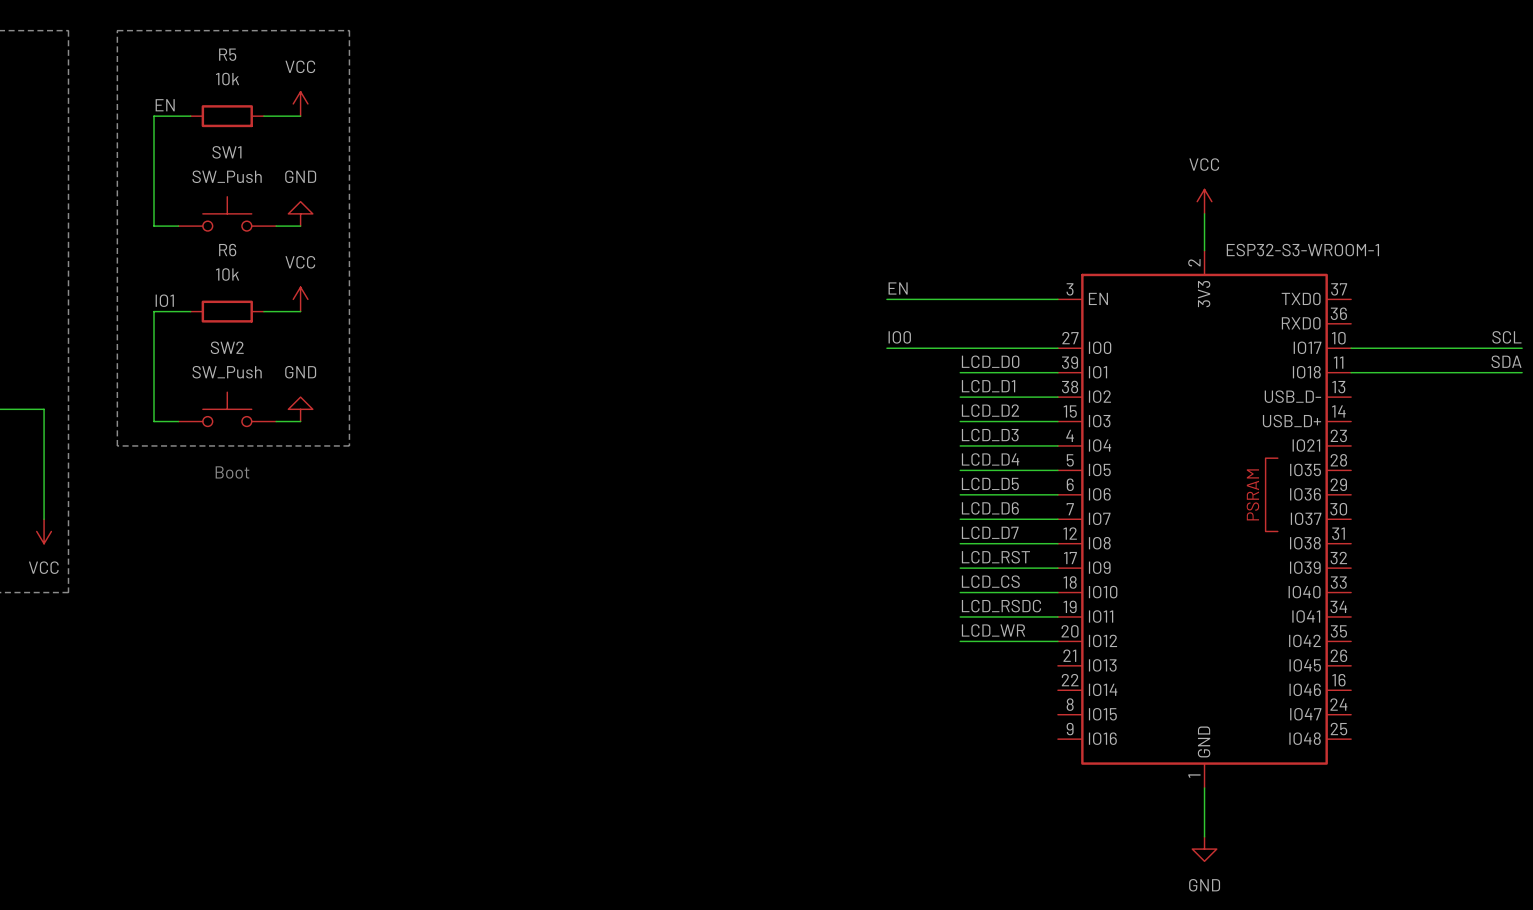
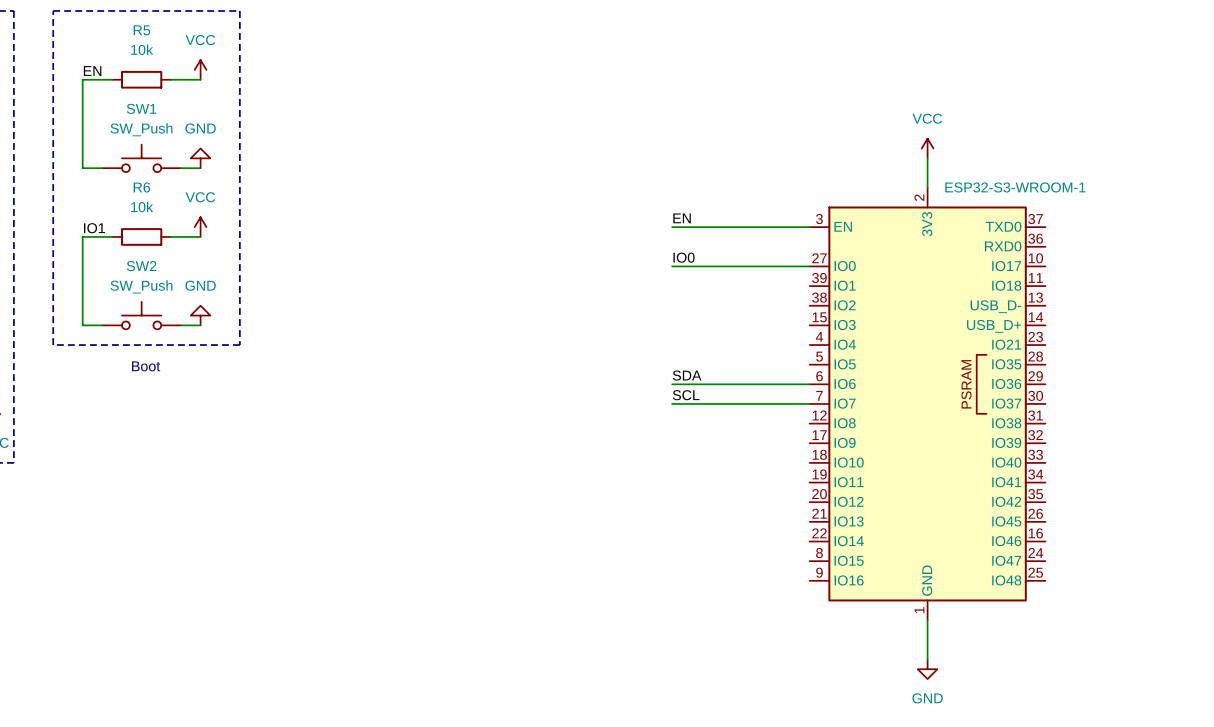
label: SCL (1506, 337) -> none
wire: (1351, 348) (1522, 348) -> none
label: LCD_D0 (990, 361) -> none
label: SDA (1506, 361) -> none
wire: (960, 372) (1057, 372) -> none
wire: (1351, 372) (1522, 372) -> none
label: LCD_D1 (988, 386) -> none
wire: (960, 397) (1057, 397) -> none
label: LCD_D2 (990, 410) -> none
wire: (960, 421) (1057, 421) -> none
label: LCD_D3 (990, 435) -> none
wire: (960, 445) (1057, 445) -> none
label: LCD_D4 (990, 459) -> none
wire: (960, 470) (1057, 470) -> none
label: none -> SDA (687, 375)
label: LCD_D5 (990, 483) -> none
wire: none -> (672, 384) (731, 384)
label: none -> SCL (686, 395)
label: LCD_D6 (990, 508) -> none
wire: none -> (672, 403) (731, 403)
label: LCD_D7 (990, 532) -> none
wire: (960, 543) (1057, 543) -> none
label: LCD_RST (995, 557) -> none
wire: (960, 568) (1057, 568) -> none
label: LCD_CS (990, 581) -> none
wire: (960, 592) (1057, 592) -> none
label: LCD_RSDC (1001, 606) -> none
wire: (960, 616) (1057, 616) -> none
label: LCD_WR (993, 630) -> none
wire: (960, 641) (1057, 641) -> none

